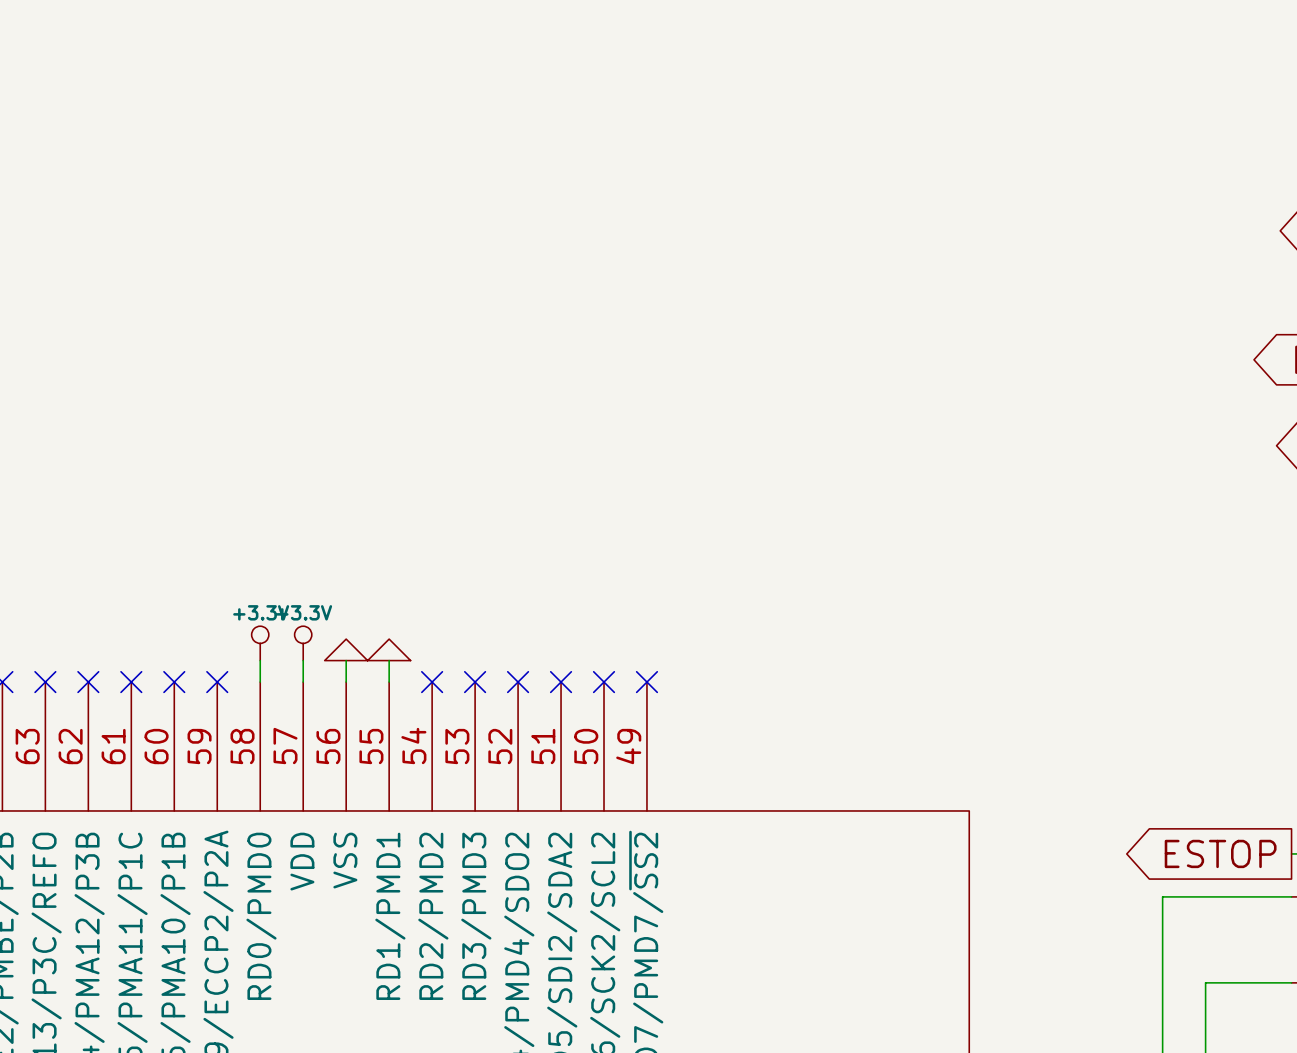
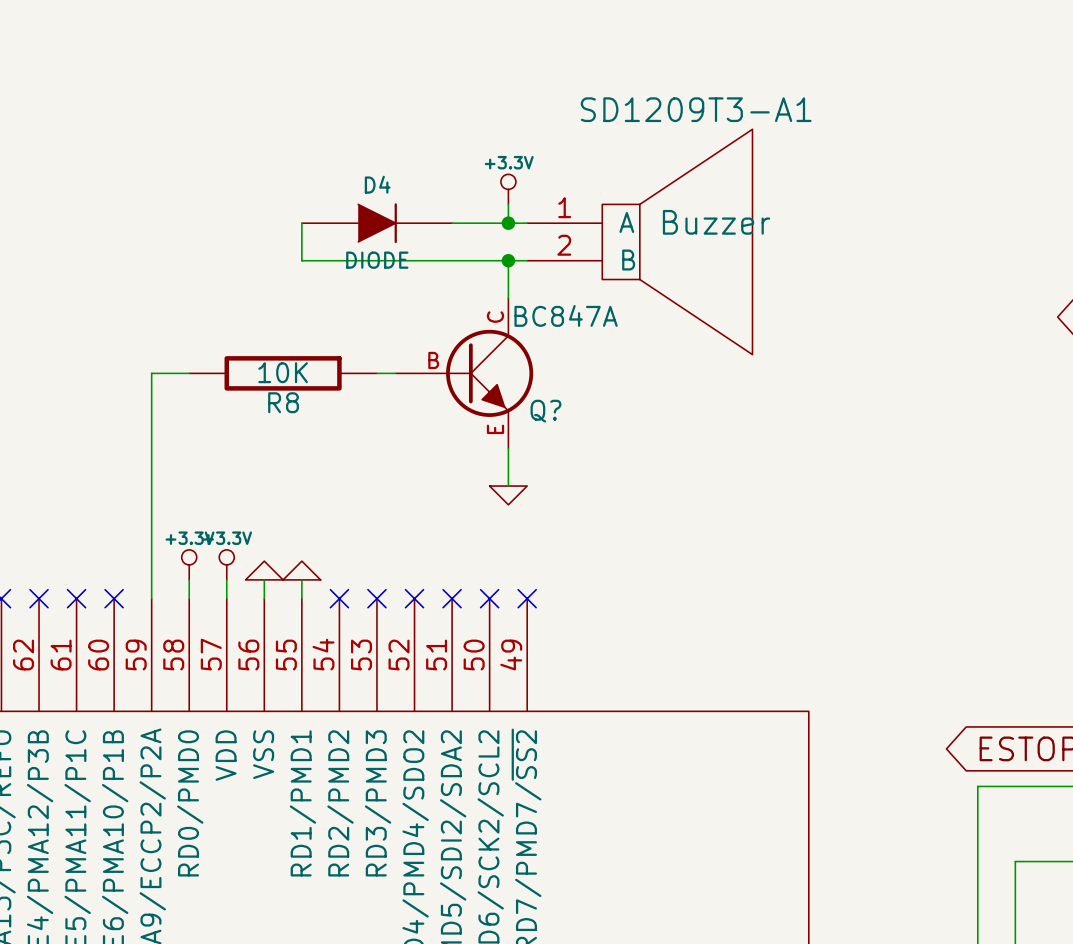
power symbol: none -> +3.3V (508, 189)
wire: none -> (508, 204) (508, 223)
wire: none -> (301, 223) (301, 260) (527, 260)
D4: none -> DIODE (376, 223)
wire: none -> (452, 223) (527, 223)
junction: none -> (508, 223)
Buzzer: none -> SD1209T3-A1 (639, 241)
wire: none -> (508, 260) (508, 298)
junction: none -> (508, 260)
wire: none -> (189, 373) (151, 373) (151, 598)
R8: none -> 10K (283, 373)
wire: none -> (376, 373) (395, 373)
Q?: none -> BC847A (464, 373)
wire: none -> (508, 448) (508, 486)
power symbol: none -> (508, 495)
no-connect mark: (217, 682) -> none

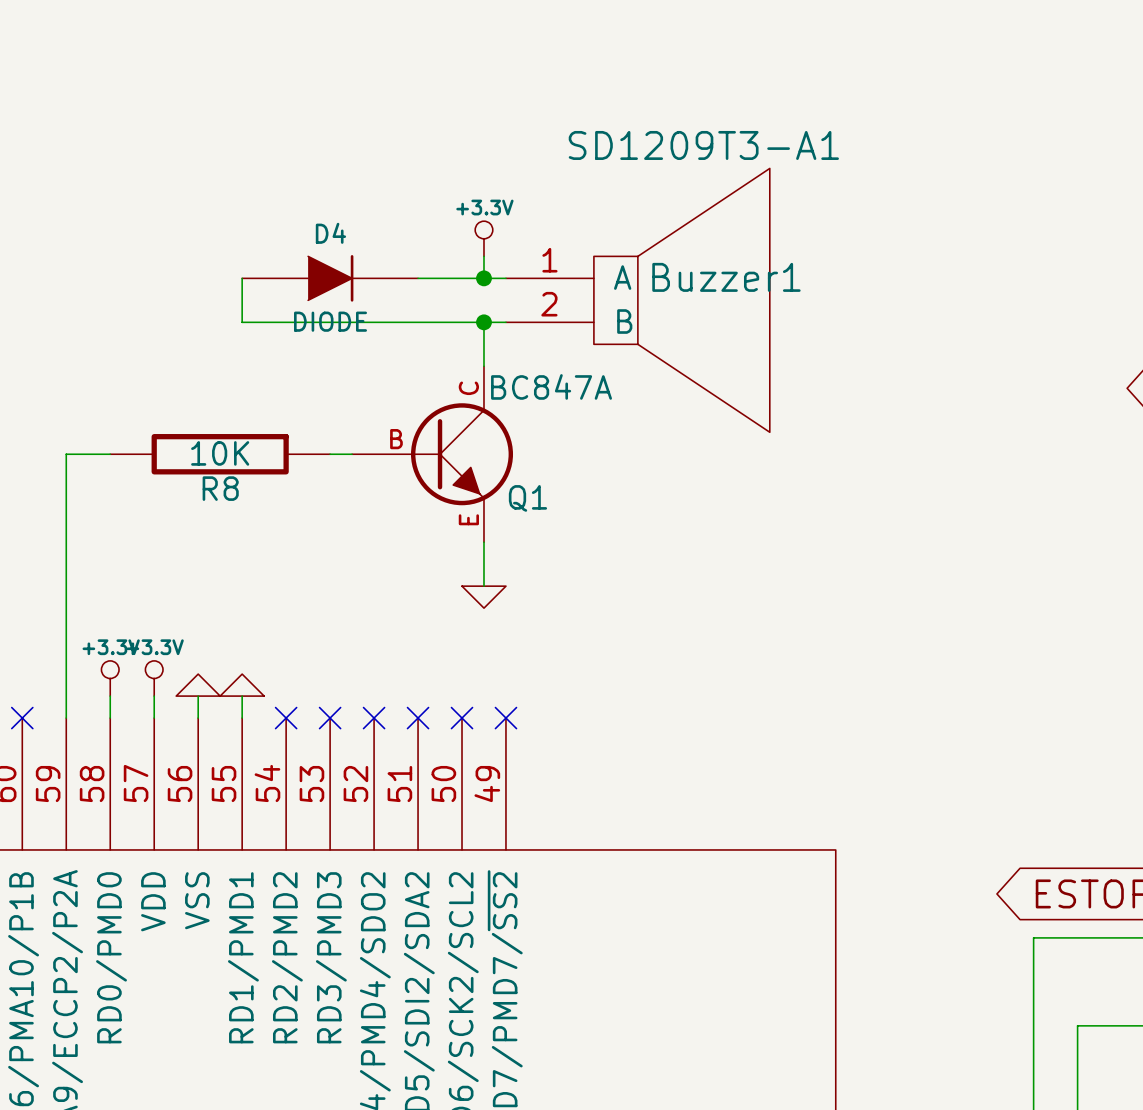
Buzzer name: Buzzer (716, 222) -> Buzzer1 (726, 277)
Q? name: Q? (545, 411) -> Q1 (527, 498)

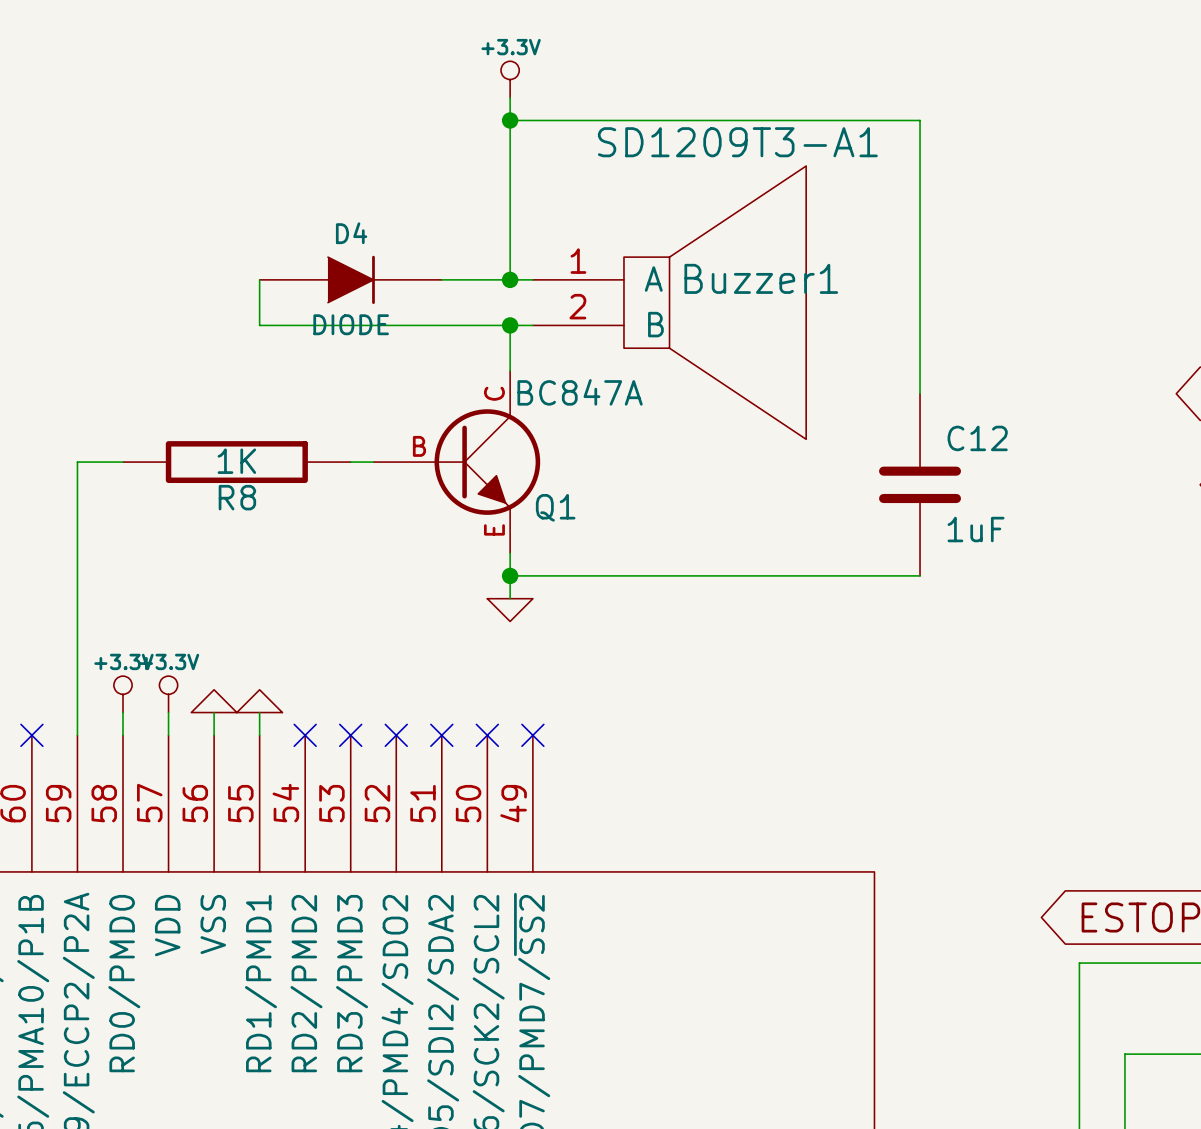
wire: none -> (510, 97) (510, 257)
wire: none -> (510, 120) (920, 120) (920, 393)
junction: none -> (510, 120)
power symbol position: +3.3V (483, 238) -> +3.3V (510, 79)
R8 value: 10K (220, 453) -> 1K (236, 461)
C12: none -> 1uF (920, 484)
wire: none -> (510, 575) (920, 575)
junction: none -> (510, 575)

